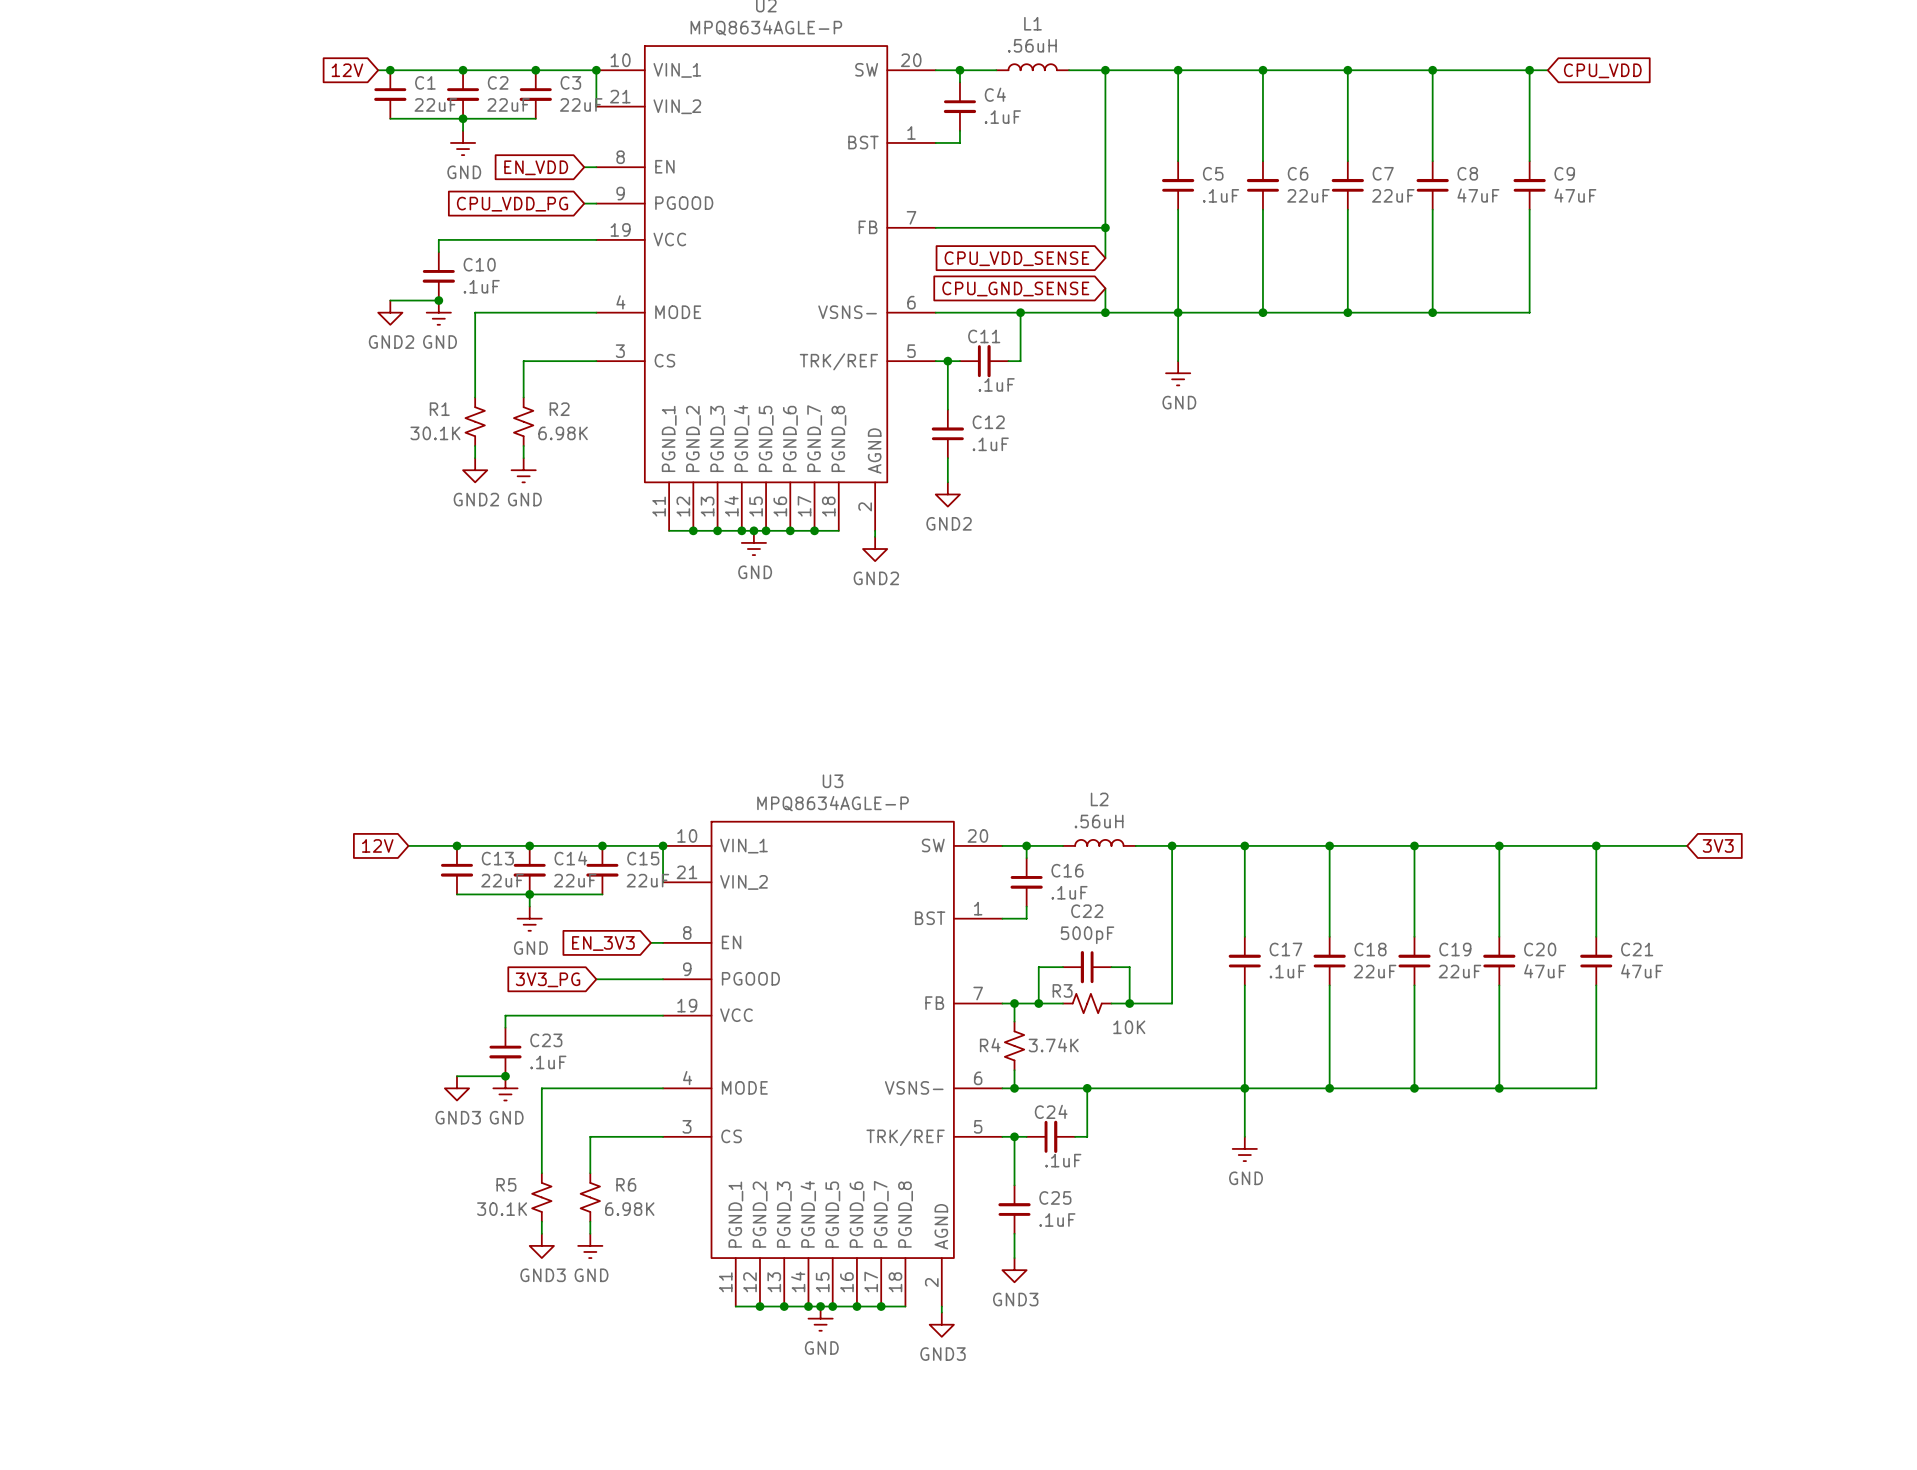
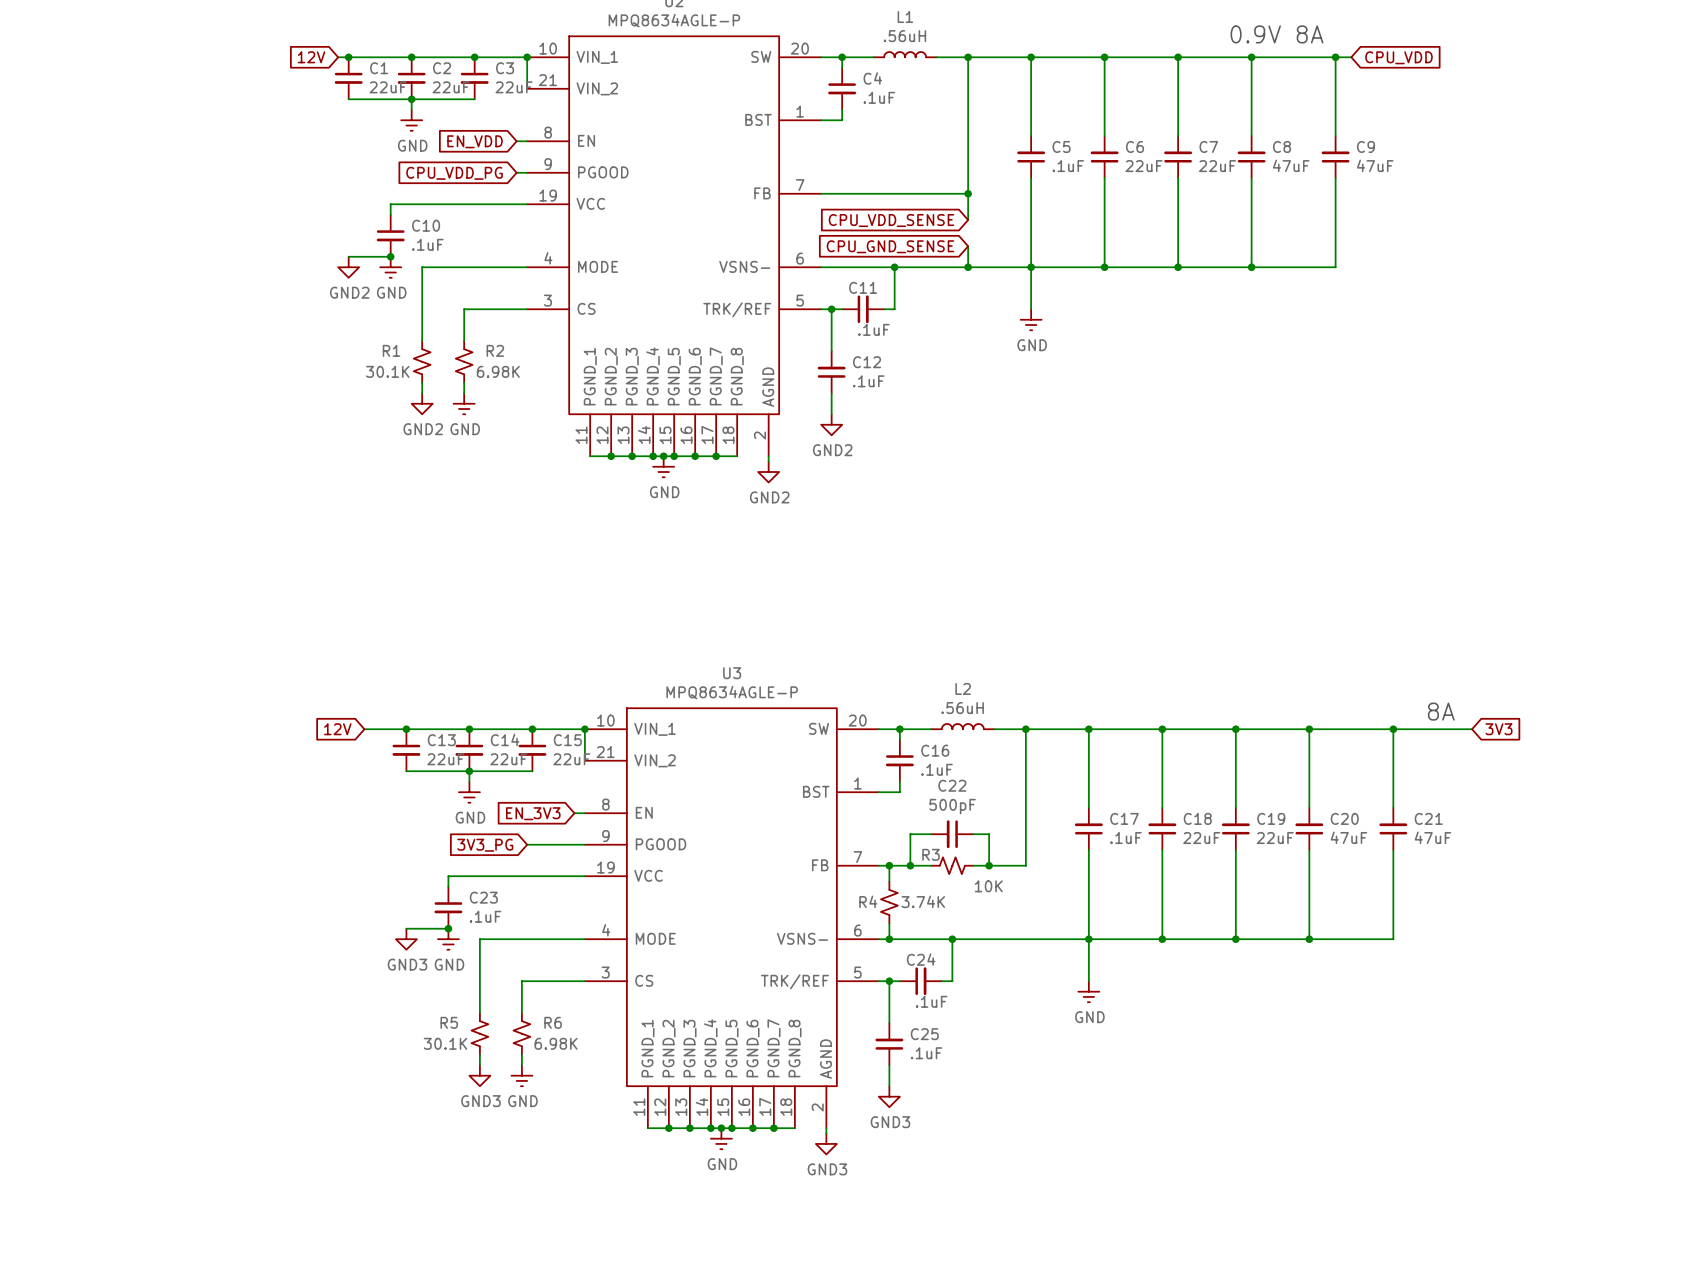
text: none -> 0.9V 8A (1277, 34)
text: none -> 8A (1441, 711)

